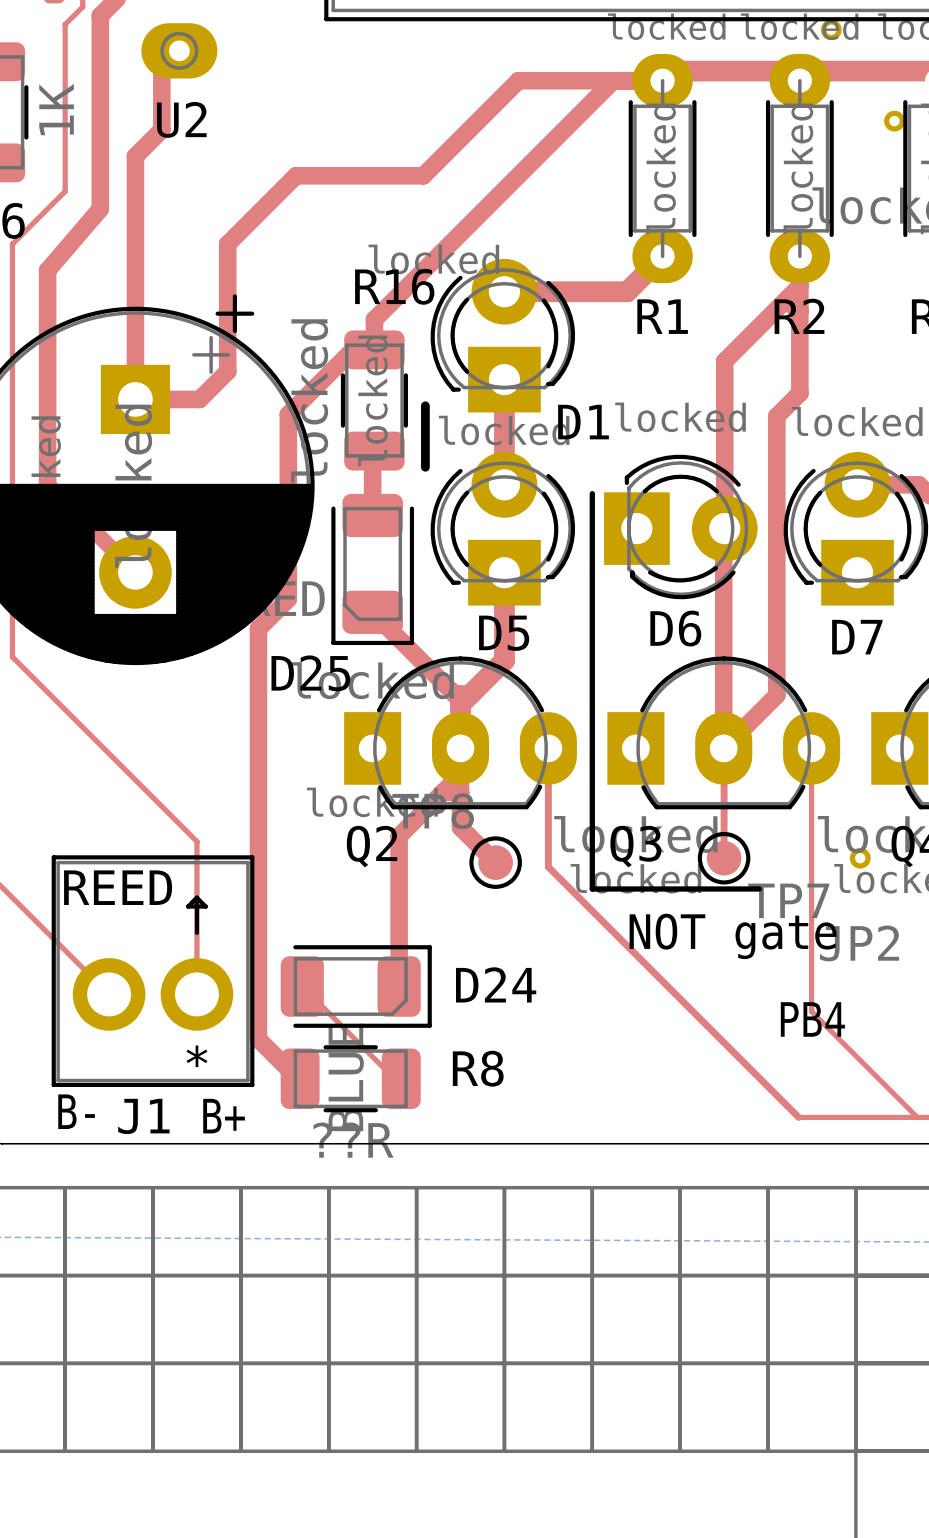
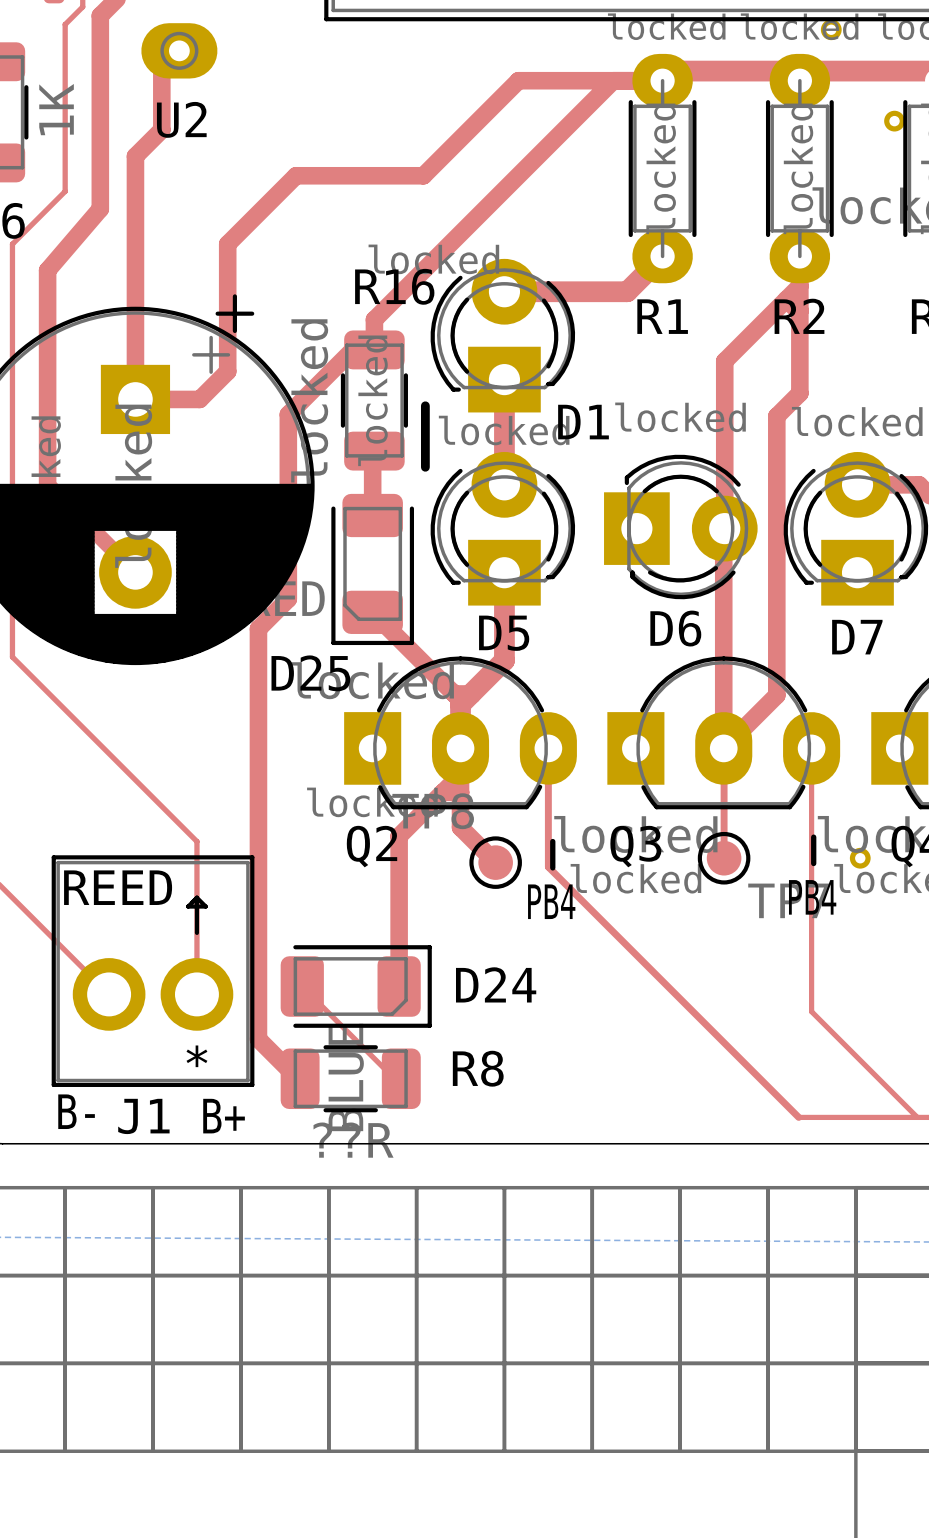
line: (592, 493) (592, 888) (759, 888) -> none
line: none -> (813, 837) (813, 863)
line: none -> (552, 841) (552, 867)
text: none -> PB4 (812, 897)
text: none -> PB4 (551, 901)
text: NOT gate (733, 936) -> none
JP2 name: JP2 (859, 943) -> none
text: PB4 (812, 1019) -> none

